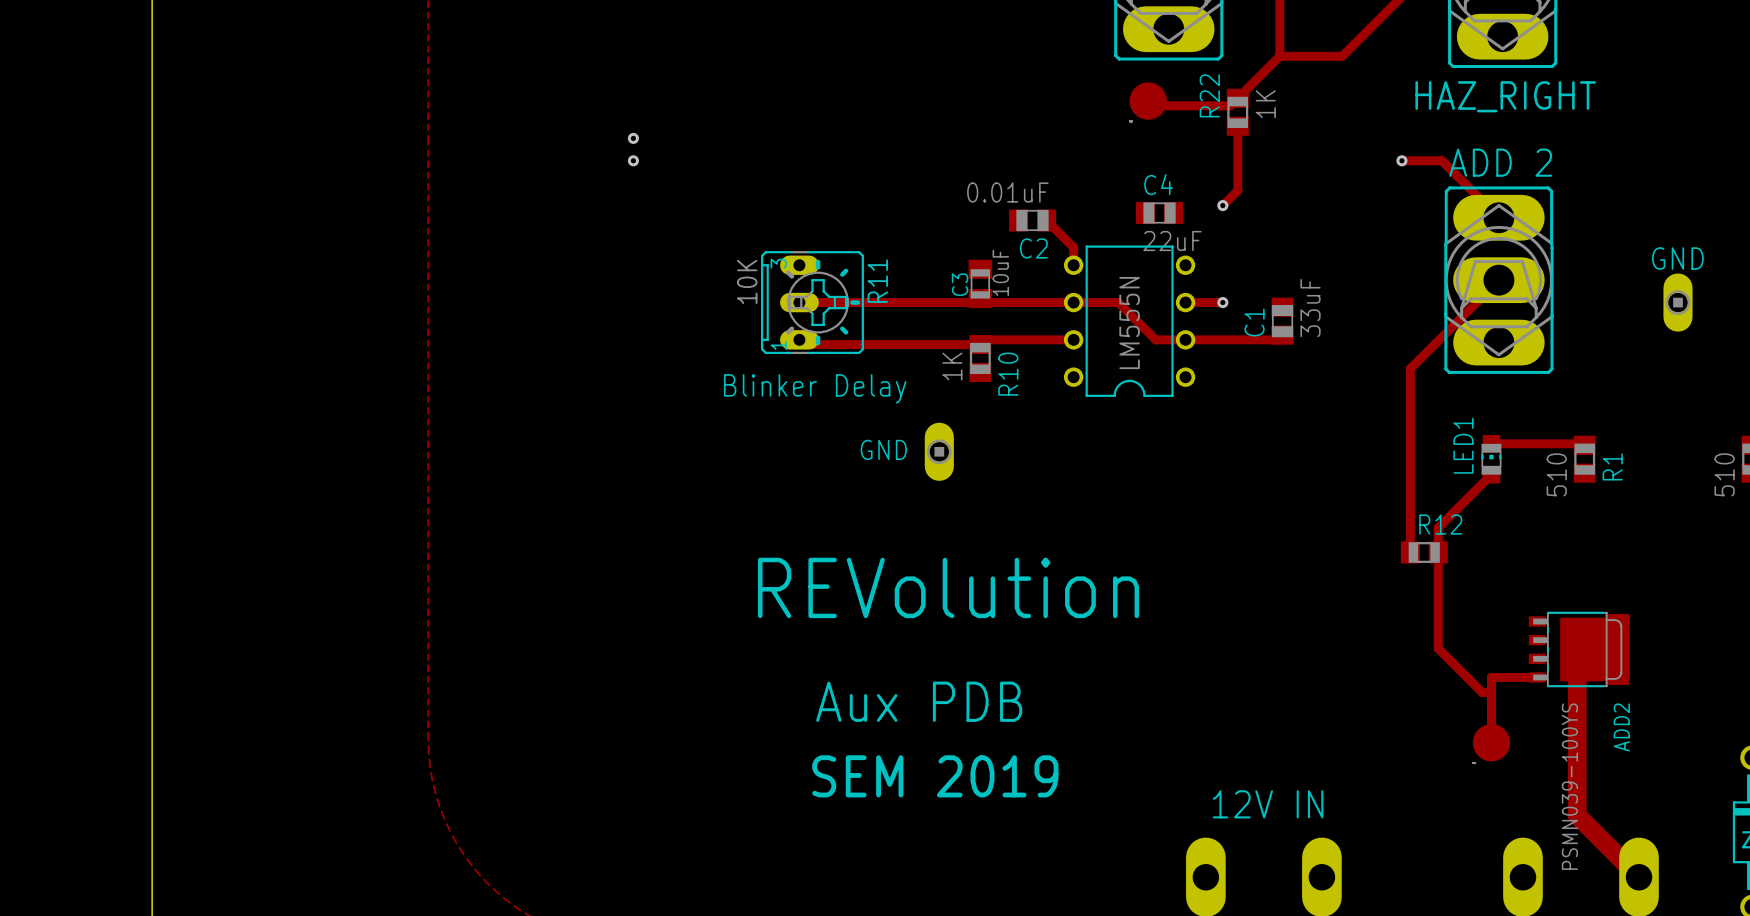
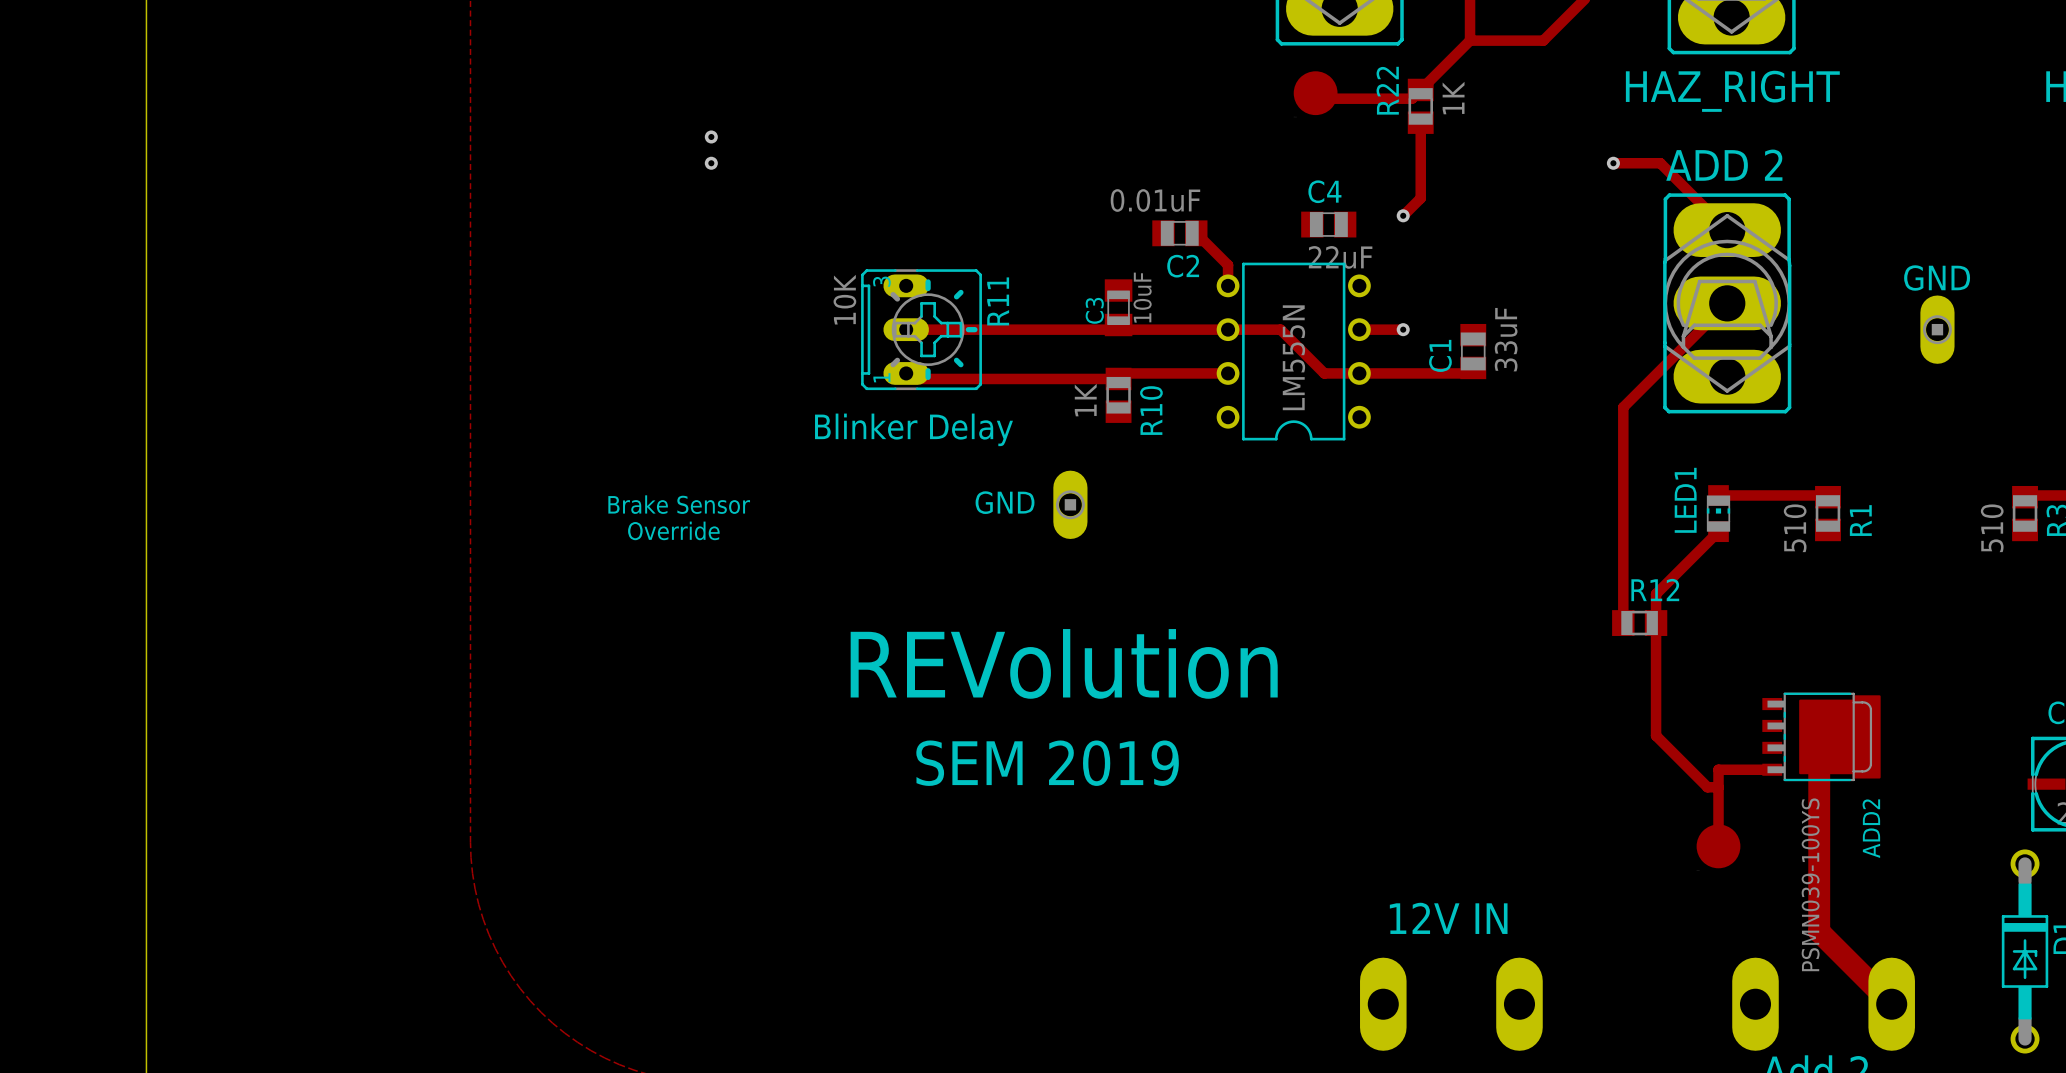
text: none -> Brake Sensor (679, 504)
text: none -> Override (673, 530)
text: Aux PDB (919, 701) -> none
text position: SEM 2019 (935, 776) -> SEM 2019 (1047, 763)

